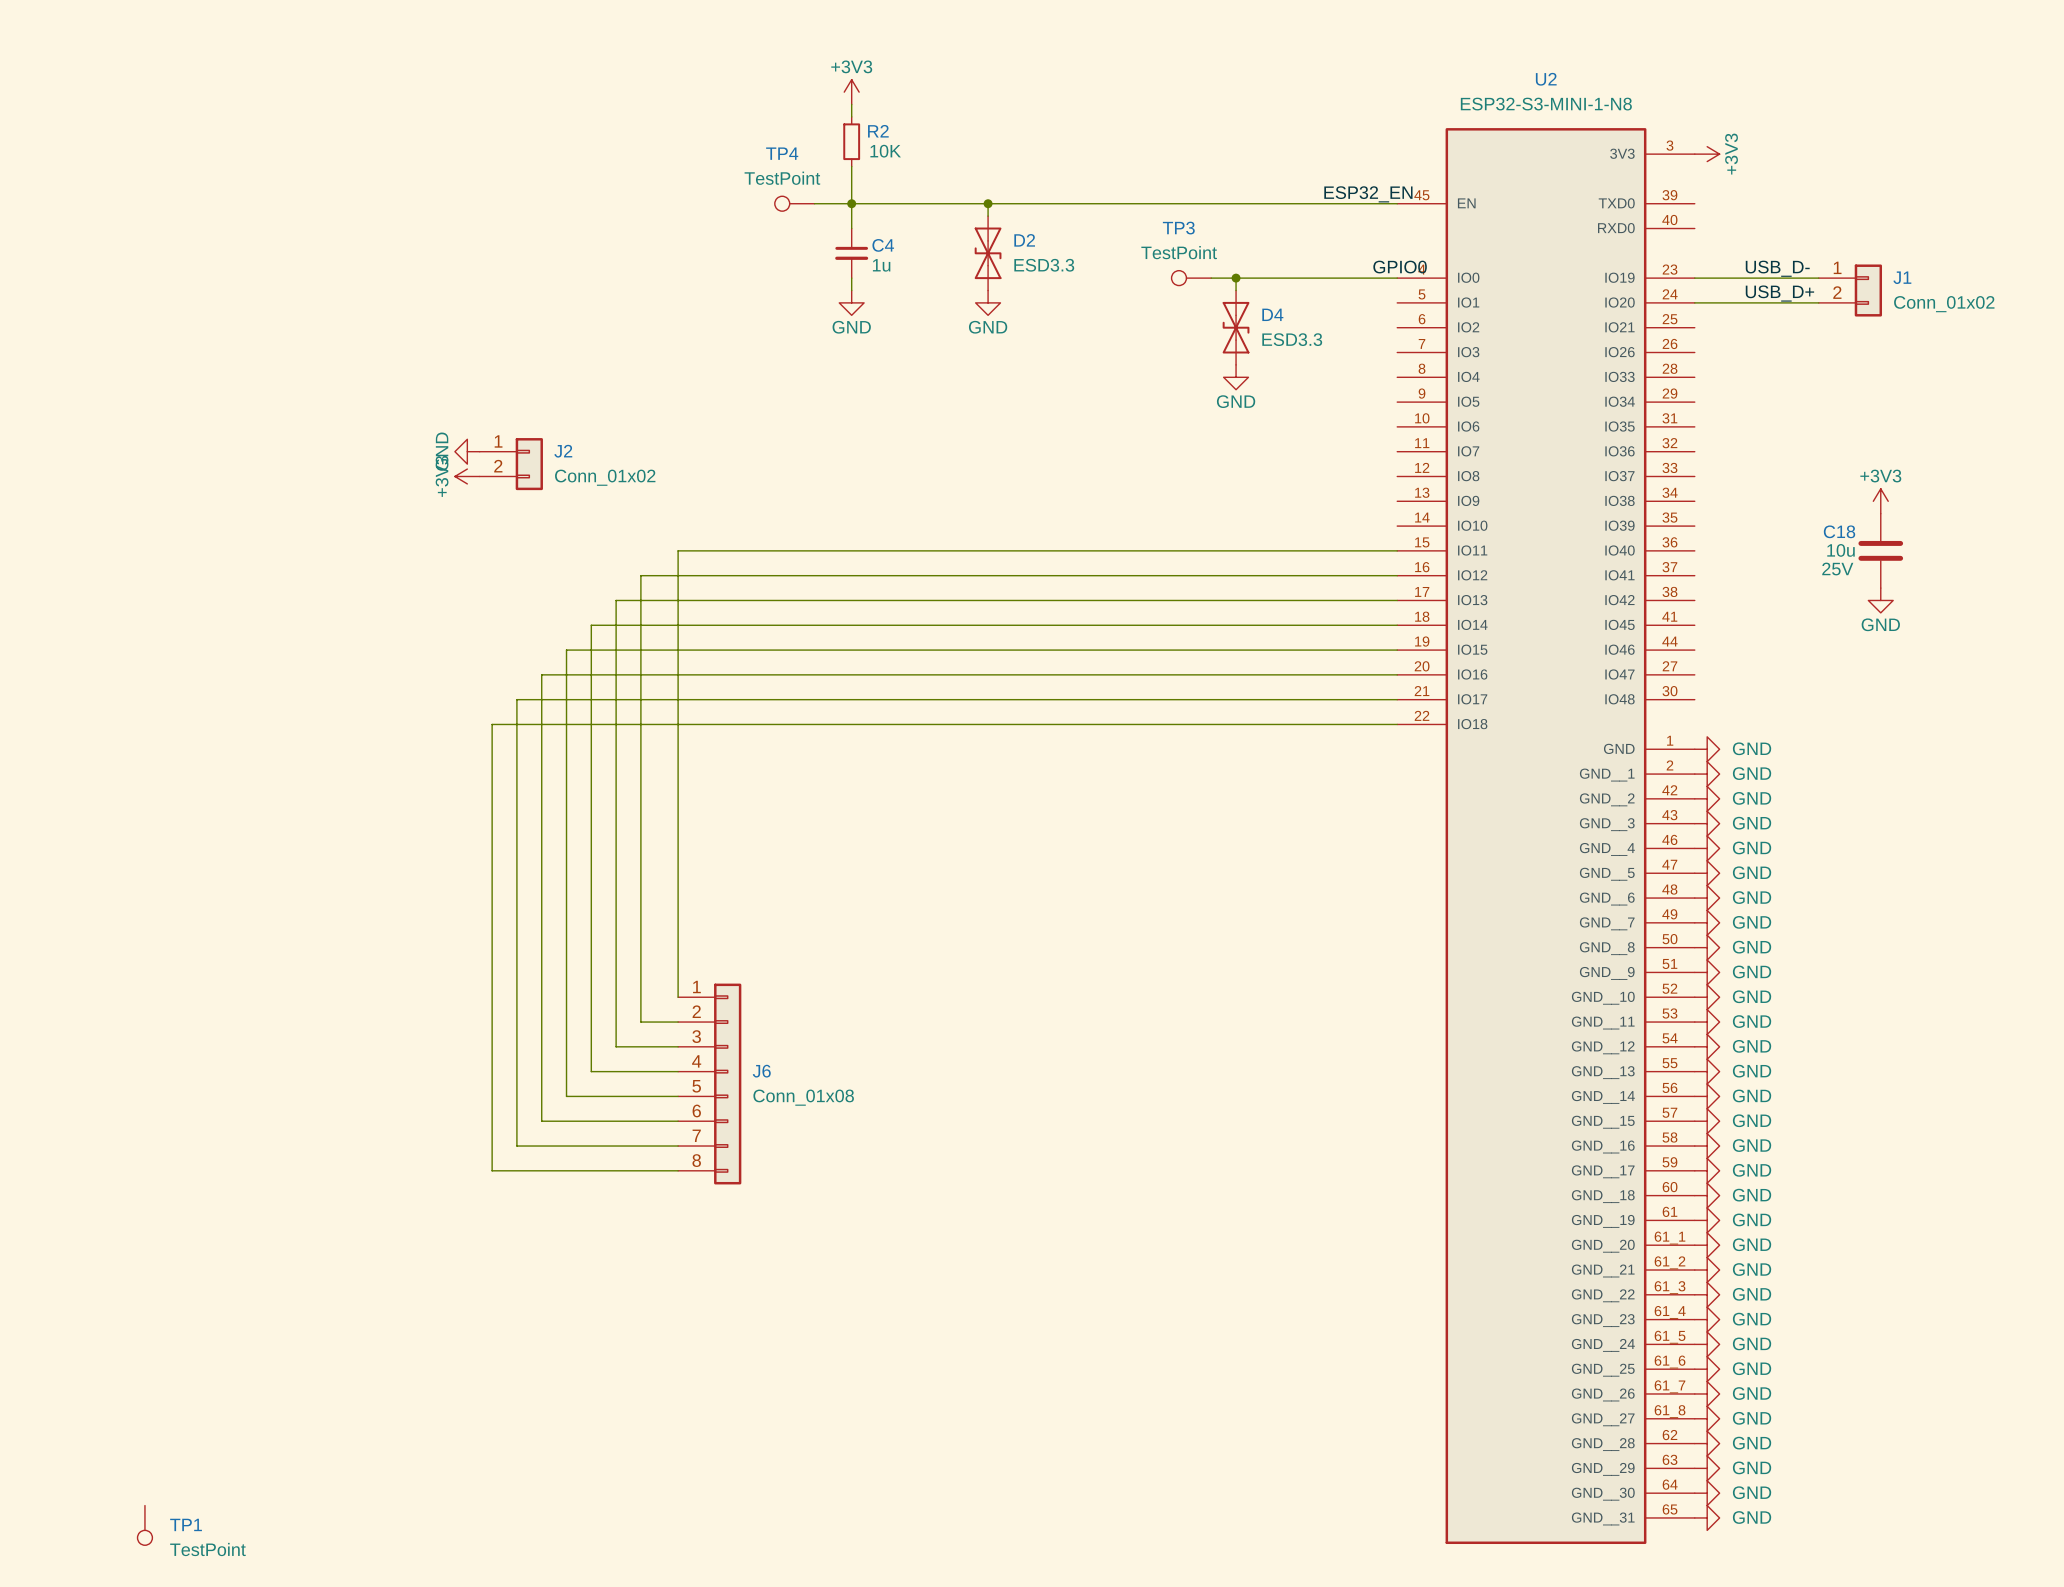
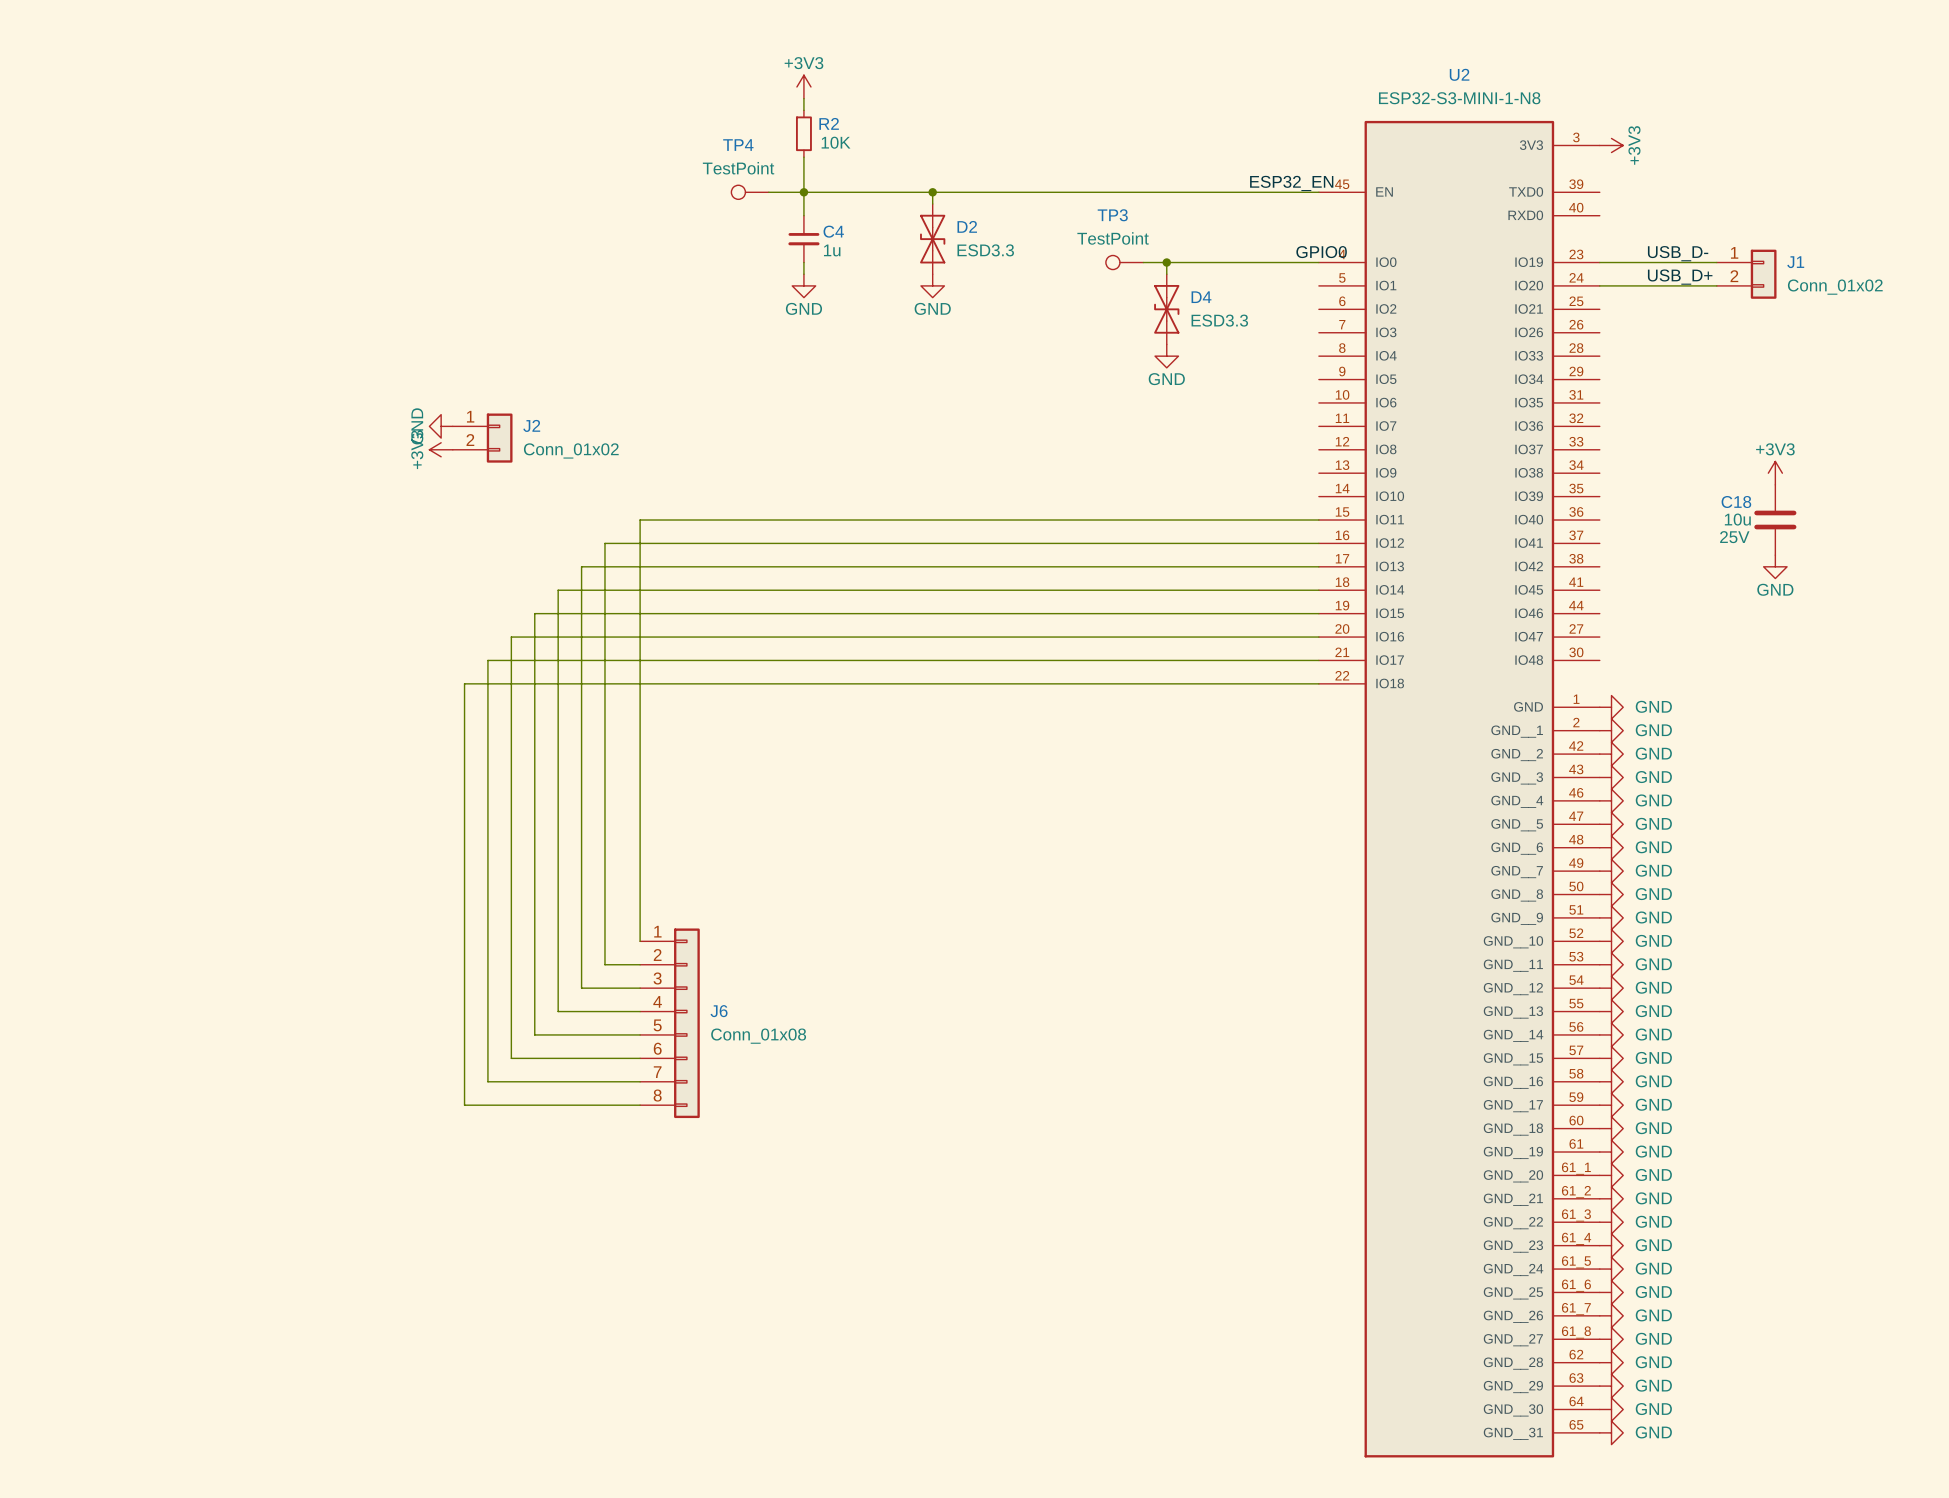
TP1: TestPoint (144, 1525) -> none

